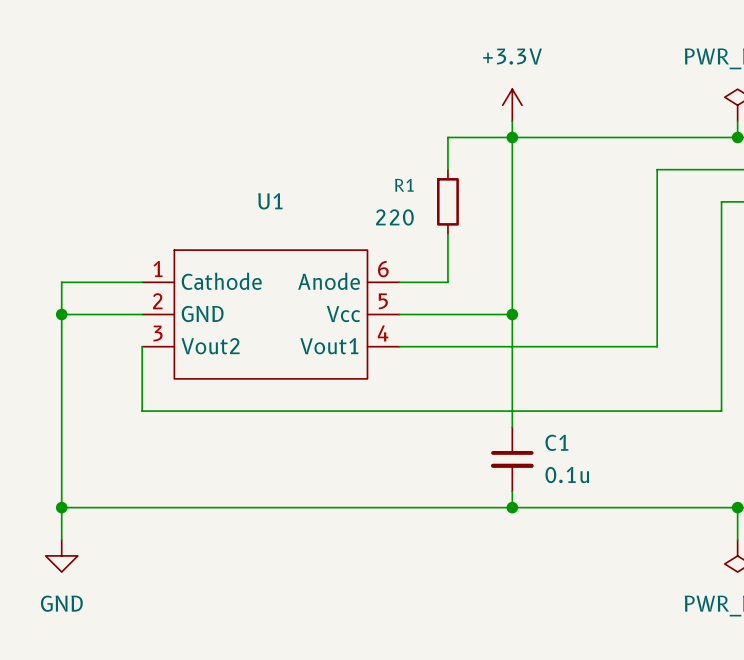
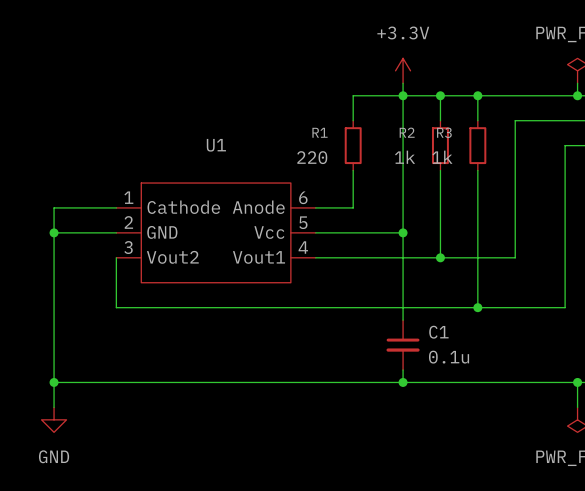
wire: none -> (440, 95) (440, 120)
junction: none -> (440, 95)
wire: none -> (477, 95) (477, 120)
junction: none -> (477, 95)
R2: none -> 1k (440, 145)
R3: none -> 1k (477, 145)
wire: none -> (440, 170) (440, 257)
wire: none -> (477, 170) (477, 307)
junction: none -> (440, 257)
junction: none -> (477, 307)

